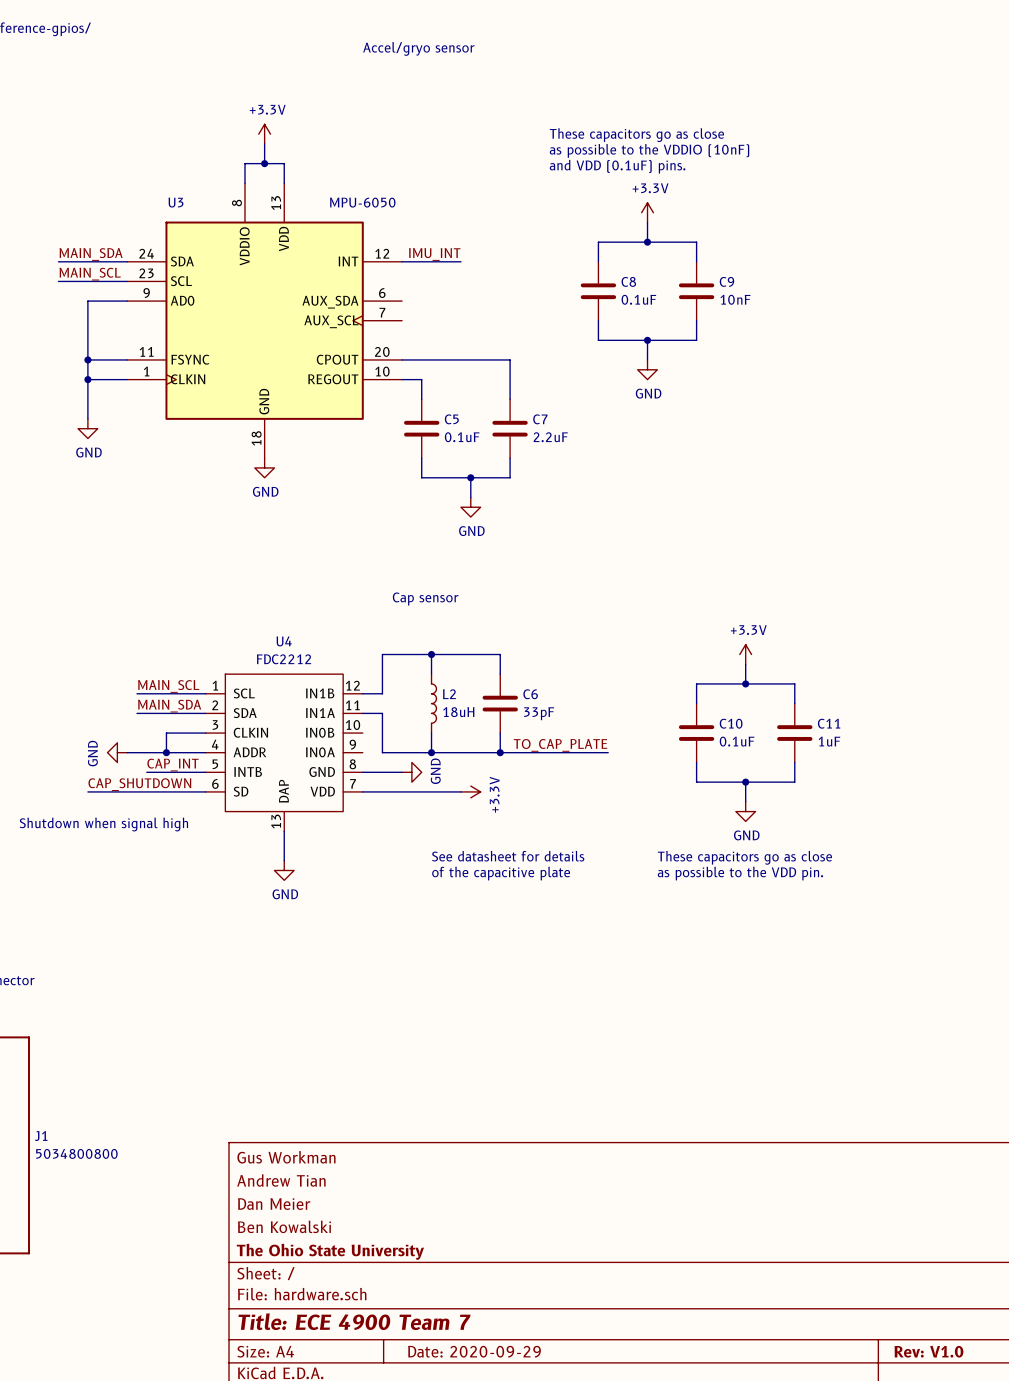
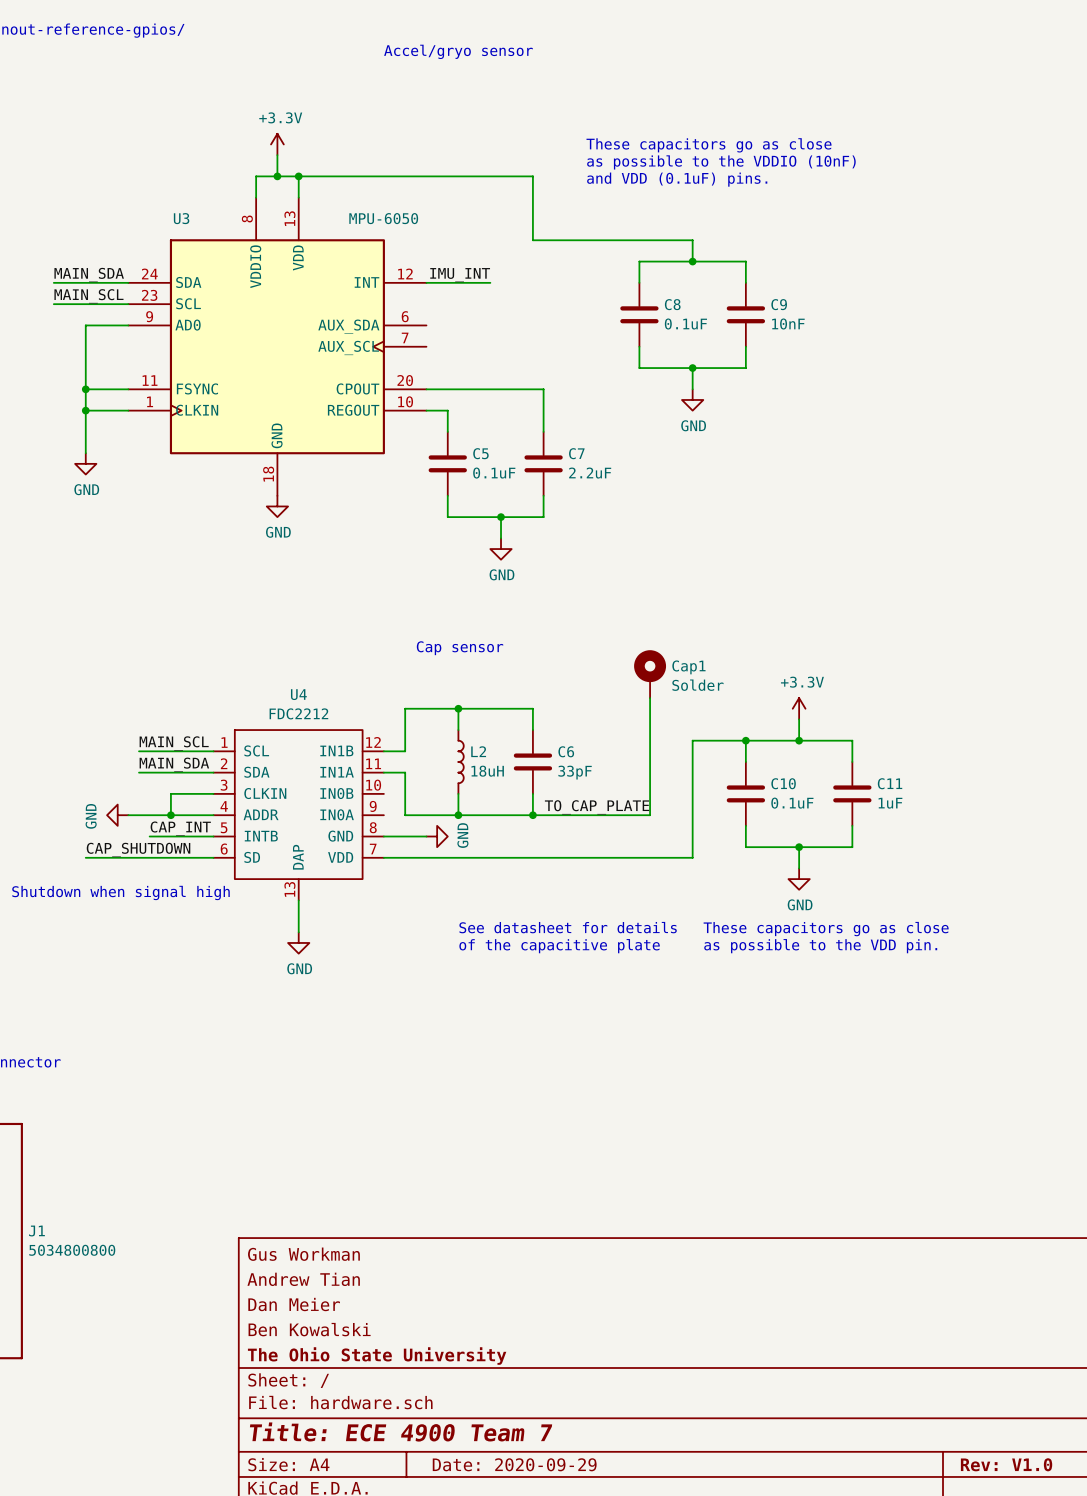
wire: none -> (298, 176) (532, 176) (532, 240) (692, 240)
junction: none -> (298, 176)
power symbol: +3.3V (647, 212) -> none
Cap1: none -> Solder (650, 674)
wire: none -> (650, 698) (650, 815)
wire: none -> (745, 740) (692, 740) (692, 857) (490, 857)
junction: none -> (745, 740)
power symbol: +3.3V (470, 791) -> none

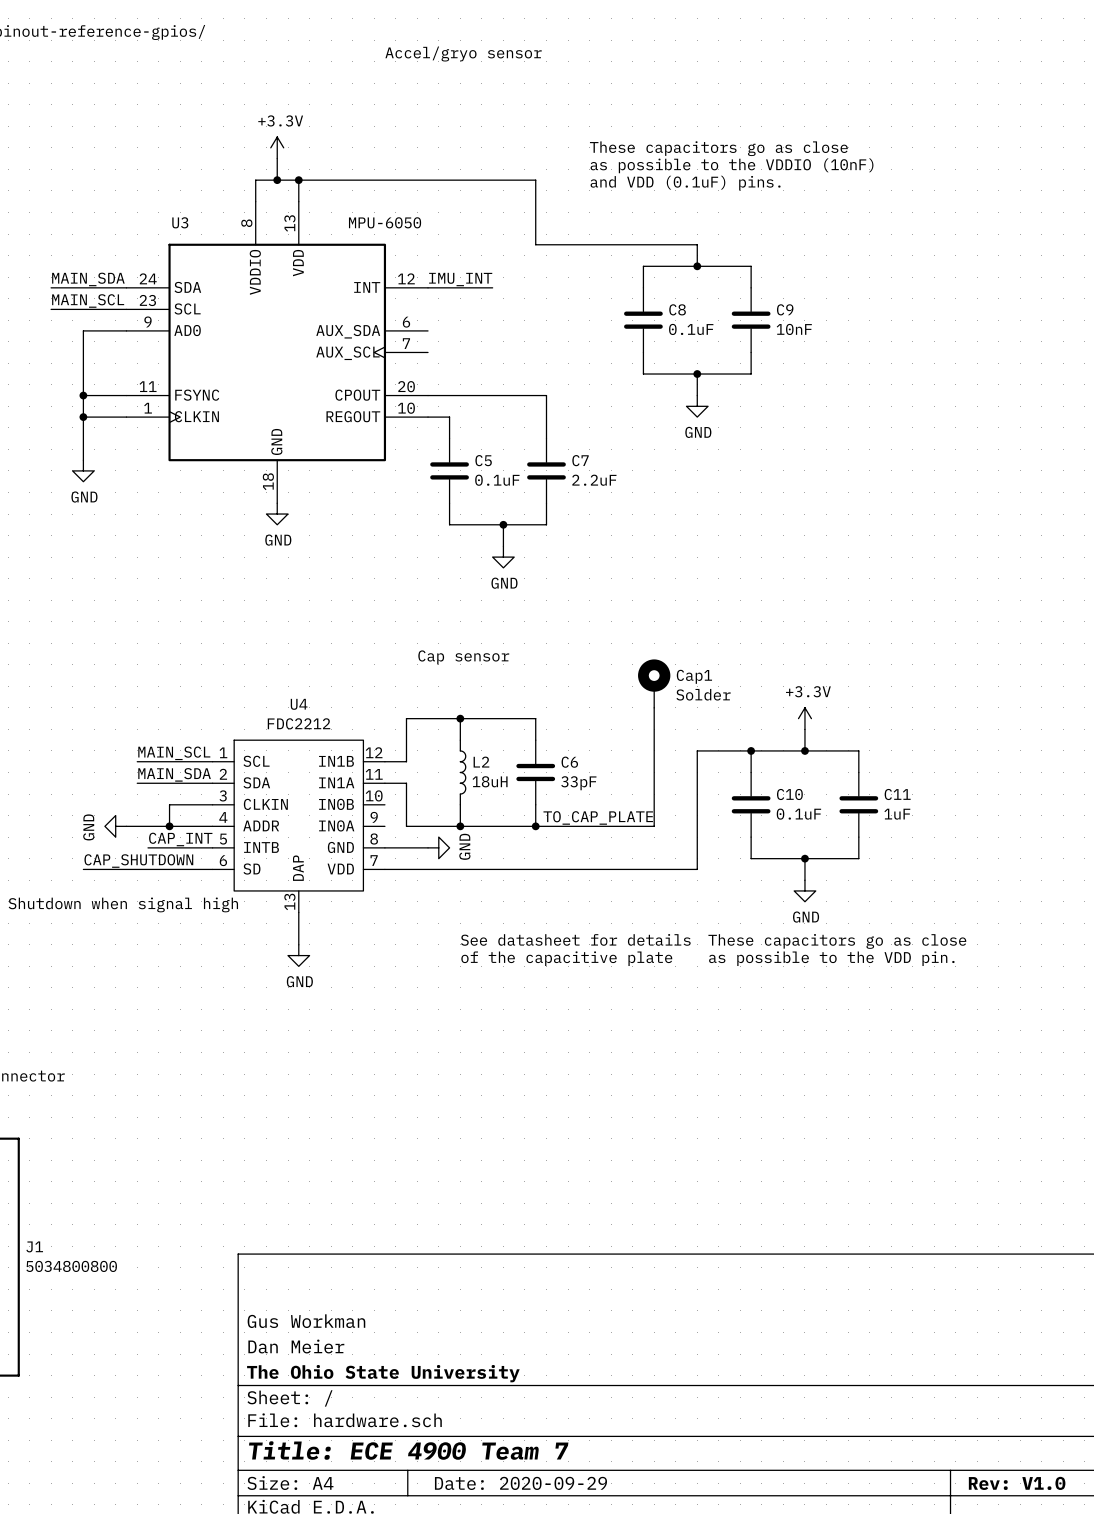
title block: Gus Workman (303, 1254) -> none
title block: Andrew Tian (303, 1279) -> none
title block: Dan Meier (294, 1304) -> Gus Workman (306, 1321)
title block: Ben Kowalski (309, 1329) -> Dan Meier (296, 1346)

